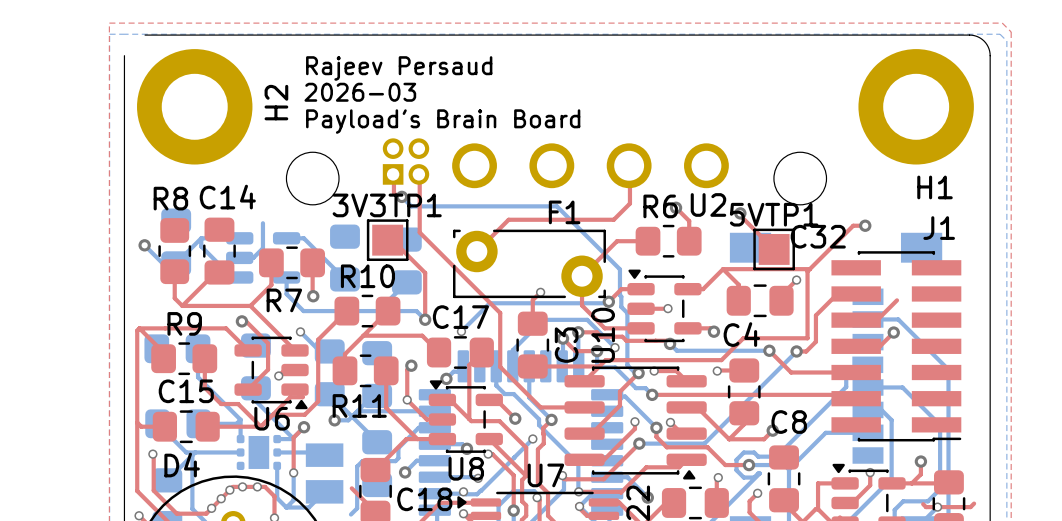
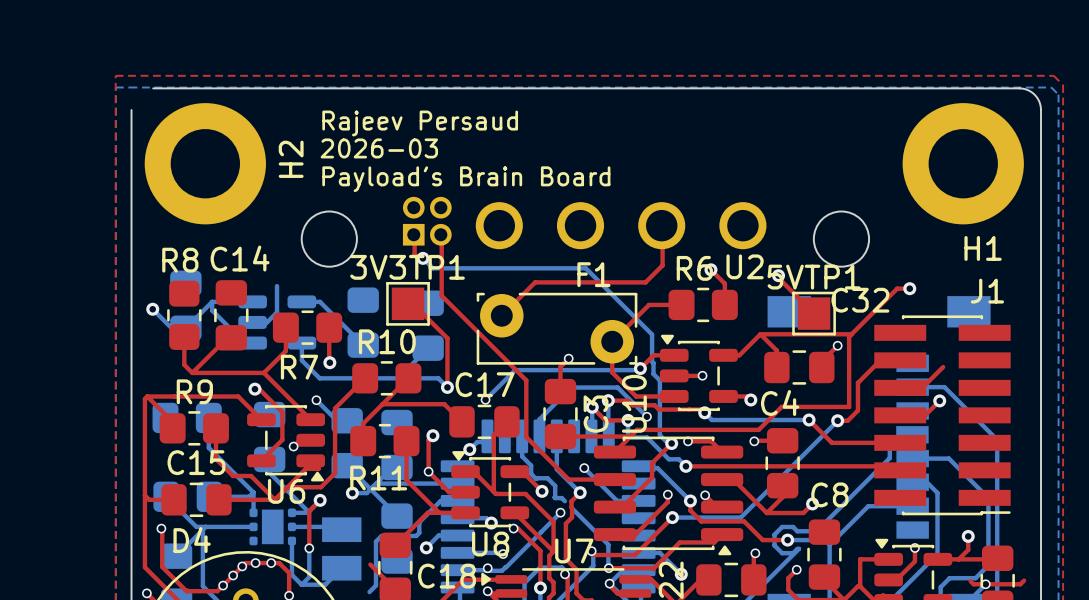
bottom track: (504, 394) (513, 394) (539, 419) (539, 425) (578, 464) (578, 469) -> (572, 508) (608, 544)
bottom track: none -> (531, 465) (531, 473) (536, 478) (547, 478) (555, 485) (554, 497) (561, 498) (564, 501)
bottom track: none -> (584, 468) (617, 500) (638, 500)
via: none -> (584, 468)

